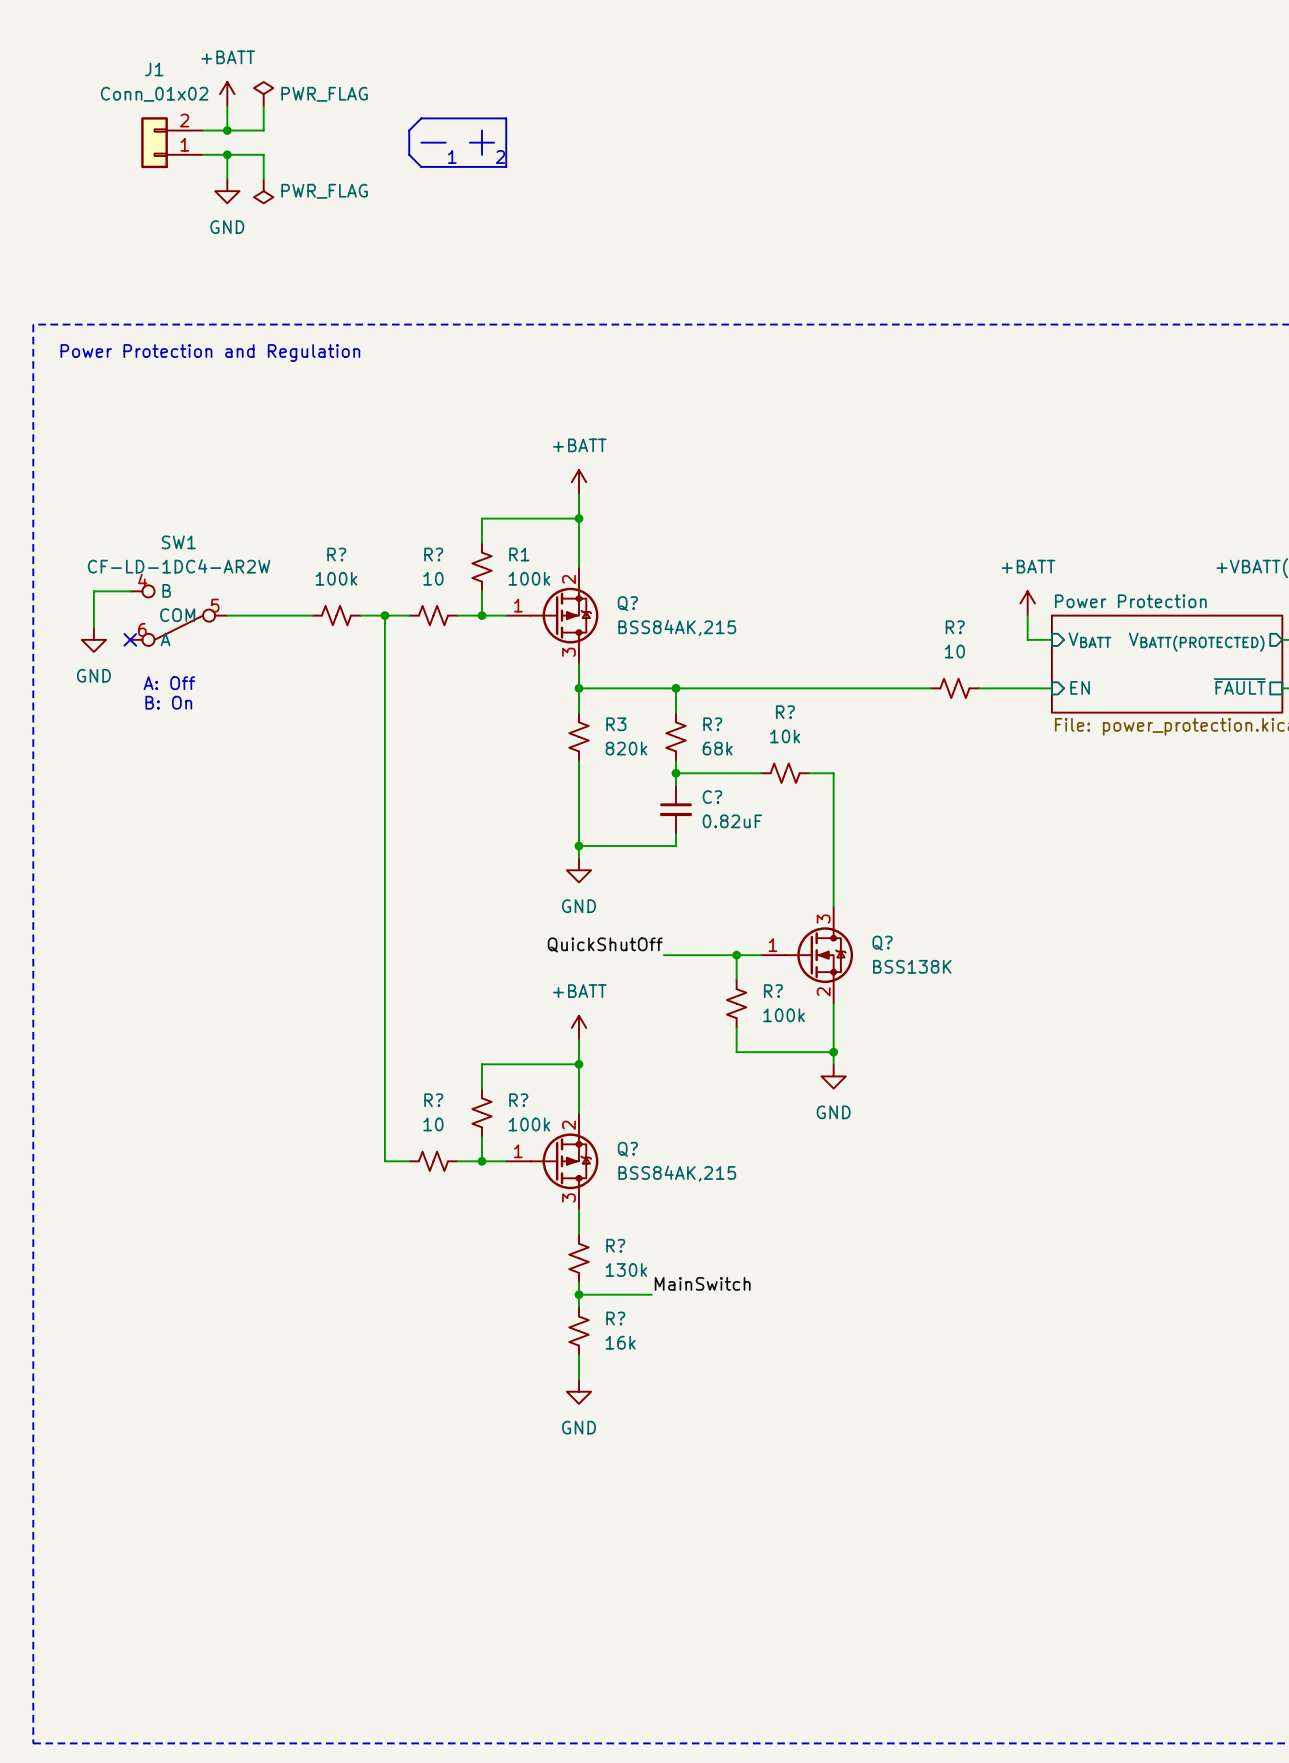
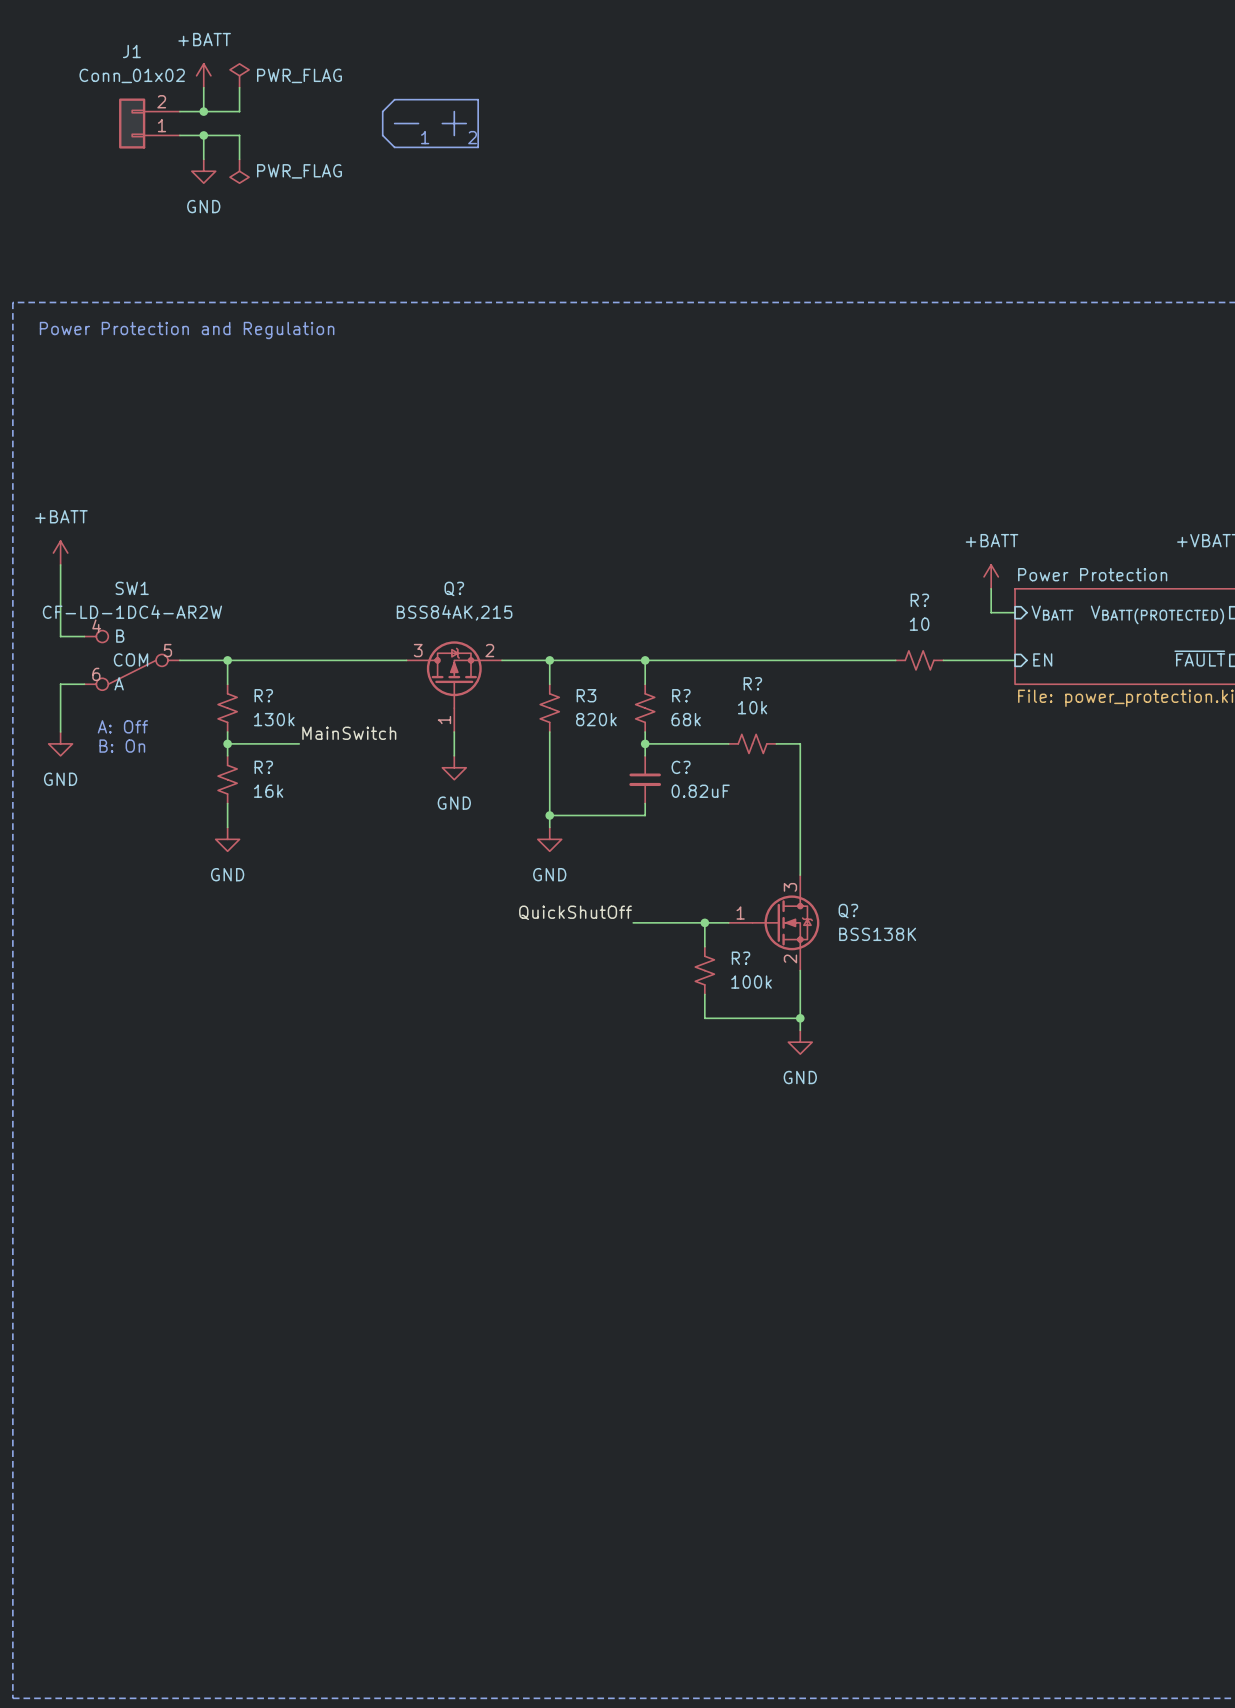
power symbol: +BATT (578, 482) -> none
wire: (578, 494) (578, 567) -> none
wire: (578, 518) (481, 518) (481, 542) -> none
junction: (578, 518) -> none
R1: 100k (481, 567) -> none
power symbol: none -> +BATT (60, 553)
wire: none -> (60, 564) (60, 636) (84, 636)
wire: (130, 591) (93, 591) (93, 627) -> none
wire: (481, 591) (481, 615) -> (454, 731) (454, 755)
SW1 position: (178, 615) -> (132, 660)
wire: (227, 615) (312, 615) -> none
R?: 100k (336, 615) -> none
wire: (360, 615) (409, 615) -> none
wire: (384, 615) (384, 1161) (409, 1161) -> none
junction: (384, 615) -> none
R?: 10 (433, 615) -> none
wire: (457, 615) (506, 615) -> none
junction: (481, 615) -> none
Q?: BSS84AK,215 (552, 615) -> none
power symbol position: GND (93, 639) -> GND (60, 743)
no-connect mark: (130, 639) -> none
wire: (578, 664) (578, 688) -> (502, 660) (549, 660)
text position: A: Off (169, 683) -> A: Off (122, 726)
wire: none -> (179, 660) (406, 660)
wire: none -> (227, 660) (227, 684)
junction: none -> (227, 660)
text position: B: On (168, 702) -> B: On (122, 746)
wire: none -> (84, 684) (60, 684) (60, 731)
Q?: none -> BSS84AK,215 (454, 686)
R?: none -> 130k (227, 708)
wire: none -> (227, 731) (227, 755)
label: none -> MainSwitch (349, 733)
wire: none -> (227, 743) (299, 743)
junction: none -> (227, 743)
power symbol: none -> GND (454, 767)
R?: none -> 16k (227, 779)
wire: none -> (227, 803) (227, 827)
power symbol: none -> GND (227, 839)
power symbol: +BATT (578, 1027) -> none
wire: (578, 1040) (578, 1112) -> none
wire: (578, 1064) (481, 1064) (481, 1088) -> none
junction: (578, 1064) -> none
R?: 100k (481, 1112) -> none
wire: (481, 1137) (481, 1161) -> none
R?: 10 (433, 1161) -> none
wire: (457, 1161) (506, 1161) -> none
junction: (481, 1161) -> none
Q?: BSS84AK,215 (552, 1161) -> none
wire: (578, 1209) (578, 1234) -> none
R?: 130k (578, 1258) -> none
wire: (578, 1282) (578, 1306) -> none
label: MainSwitch (702, 1283) -> none
wire: (578, 1294) (651, 1294) -> none
junction: (578, 1294) -> none
R?: 16k (578, 1331) -> none
wire: (578, 1355) (578, 1379) -> none
power symbol: GND (578, 1391) -> none

